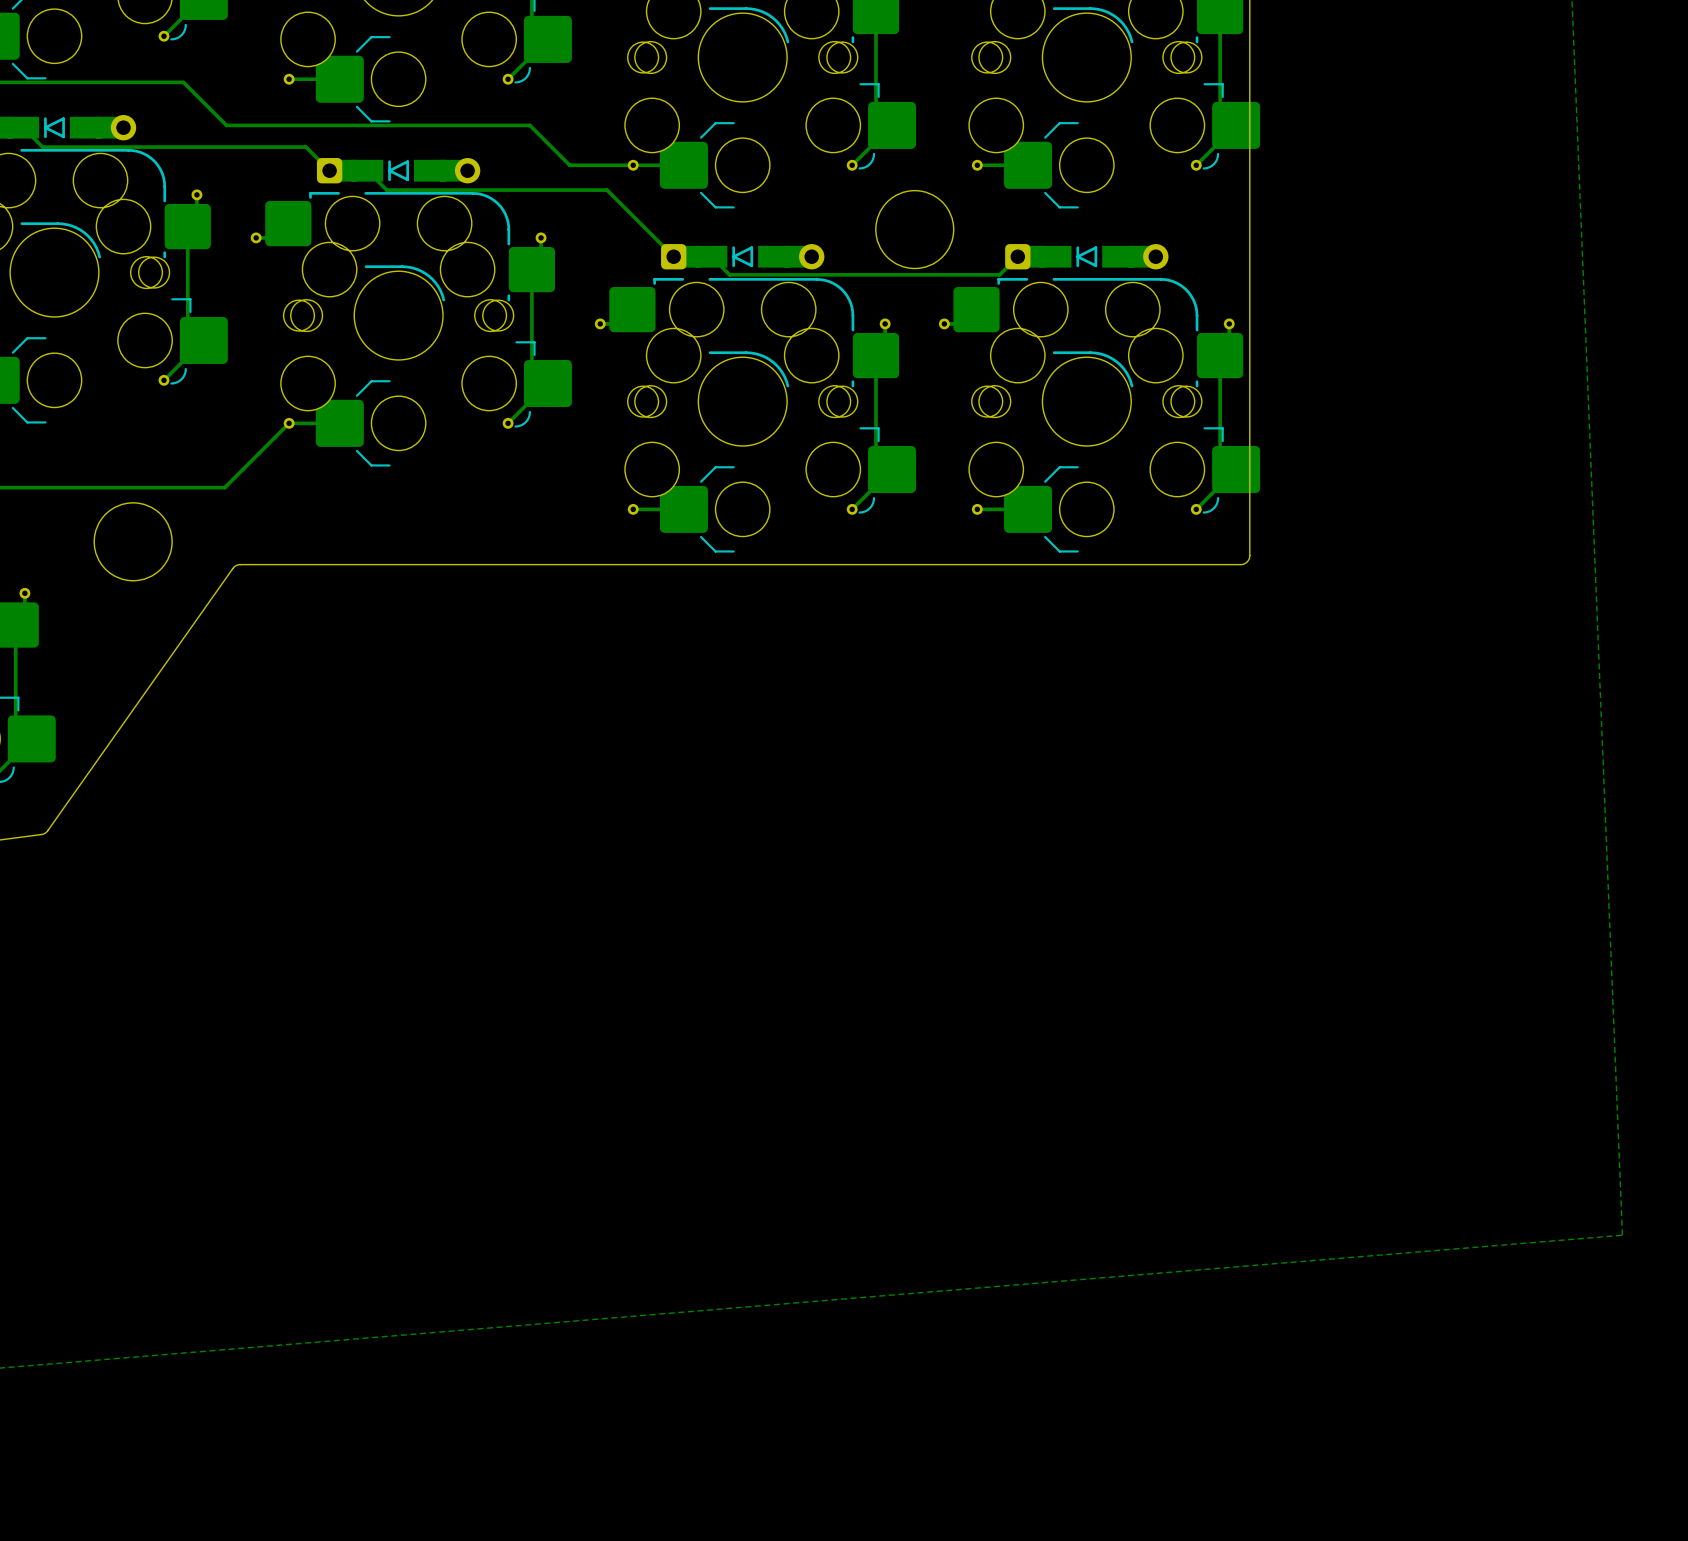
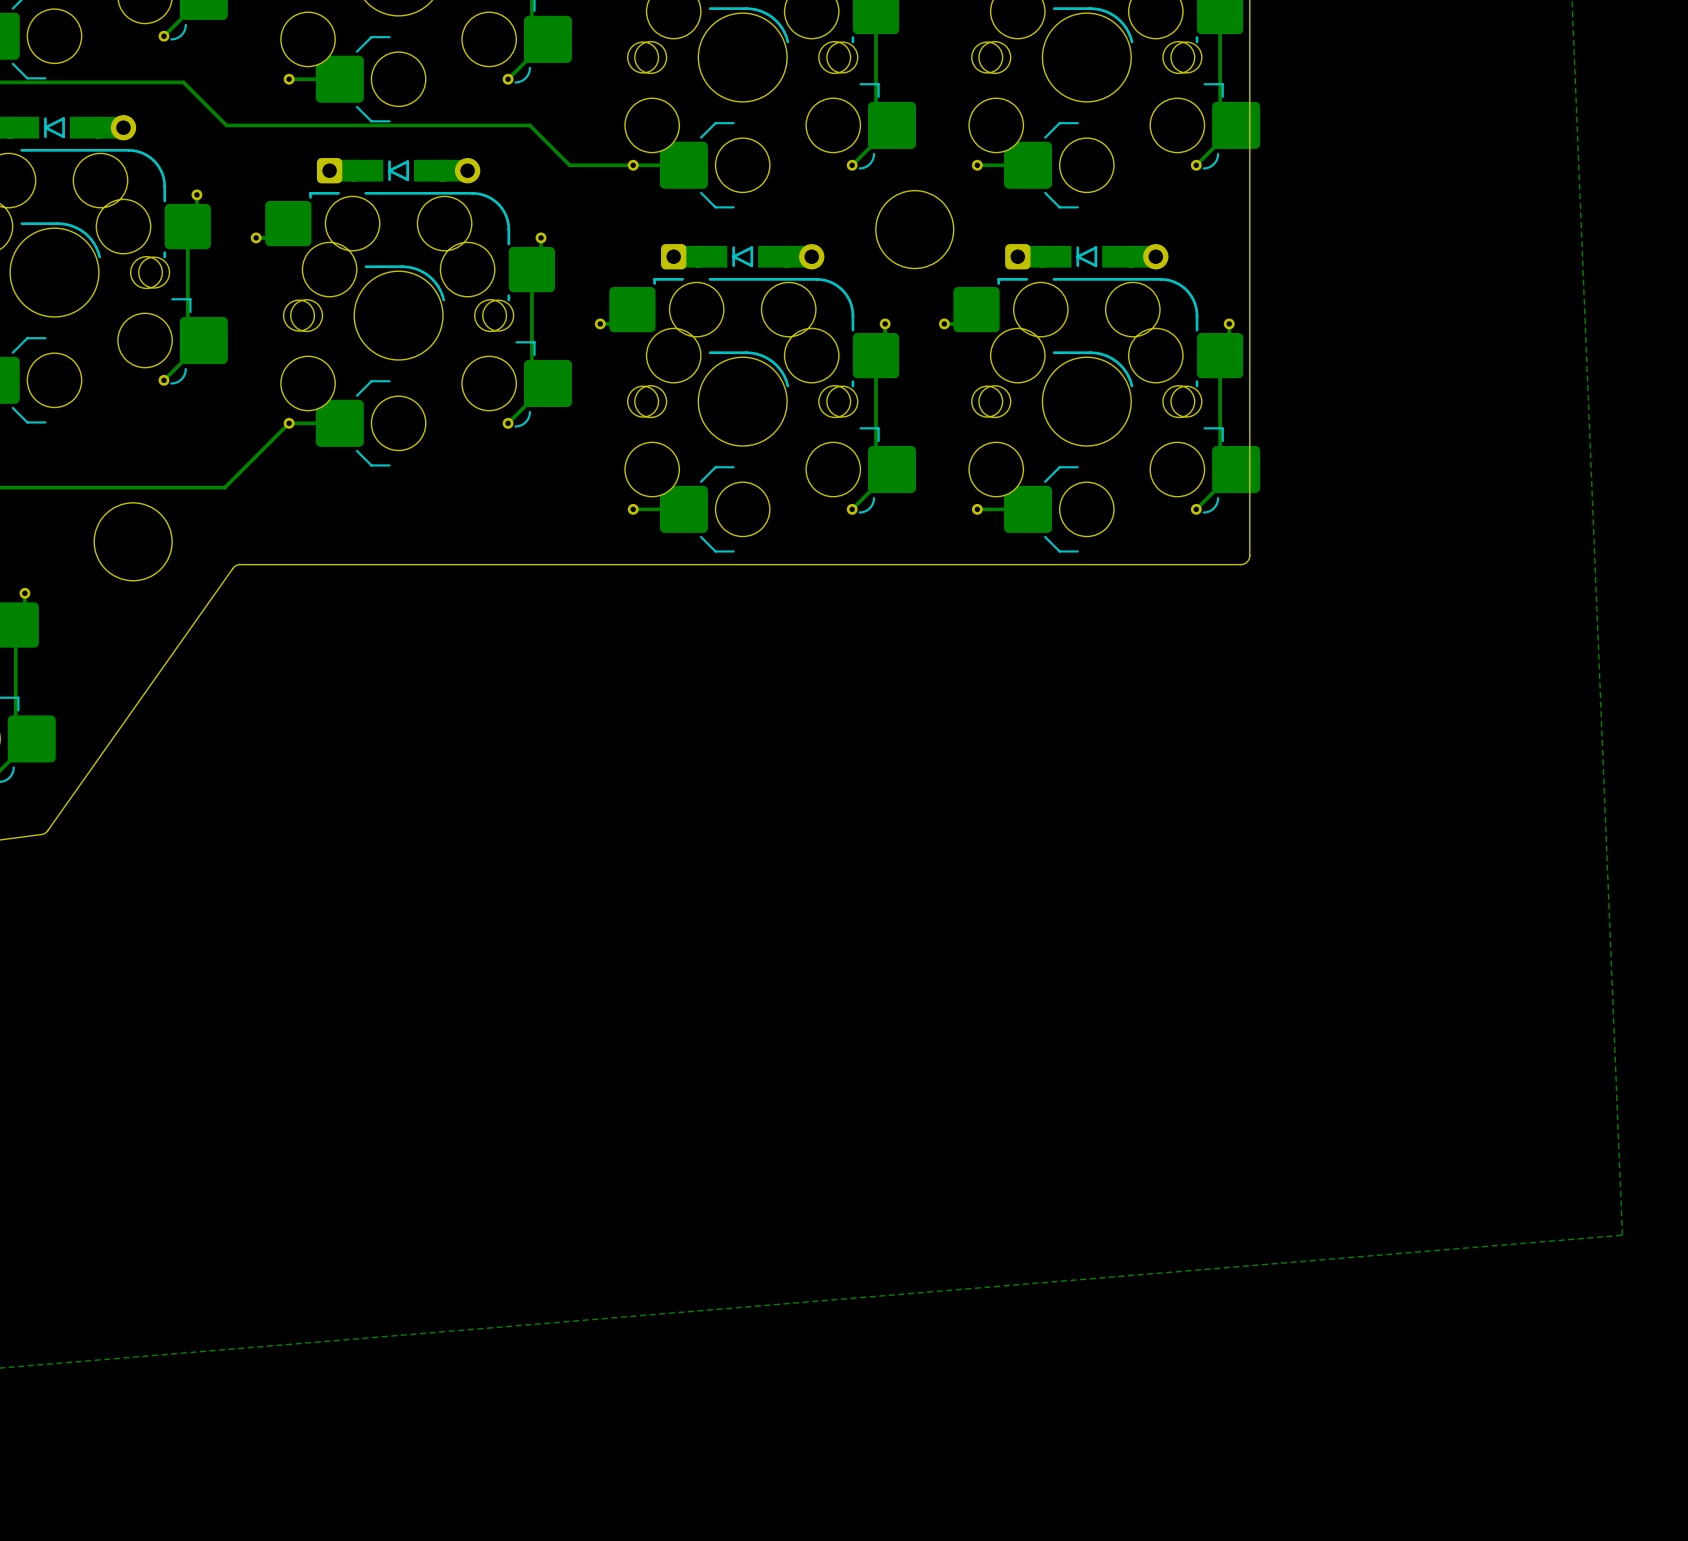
track: (23, 127) (42, 147) (305, 147) (329, 170) -> none
track: (367, 170) (386, 190) (607, 190) (673, 256) -> none
track: (1017, 256) (999, 274) (729, 274) (711, 256) -> none

